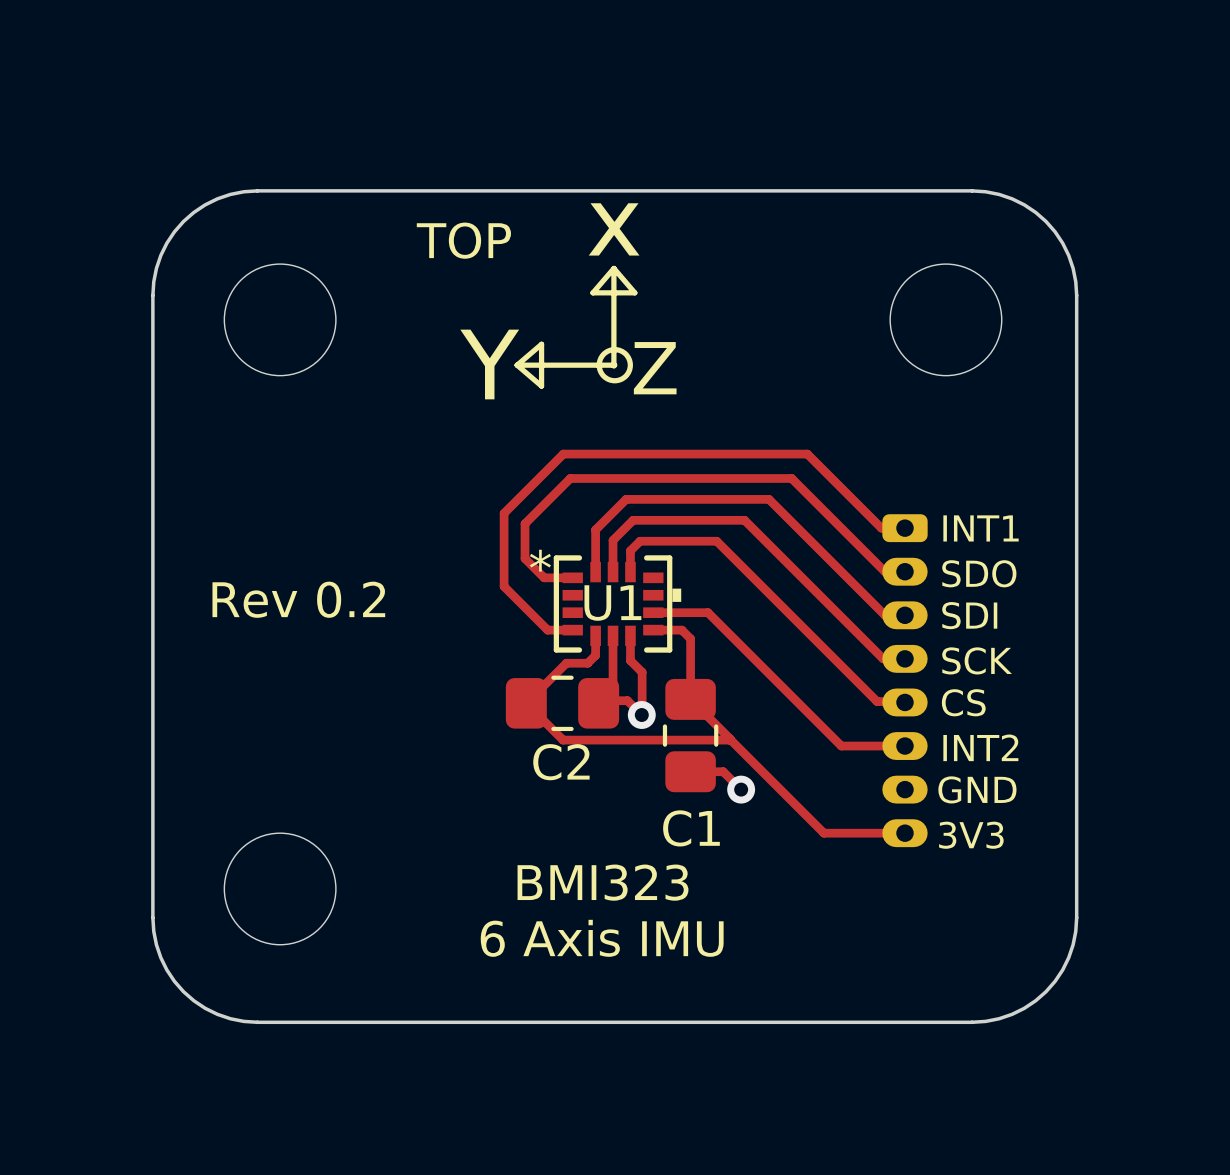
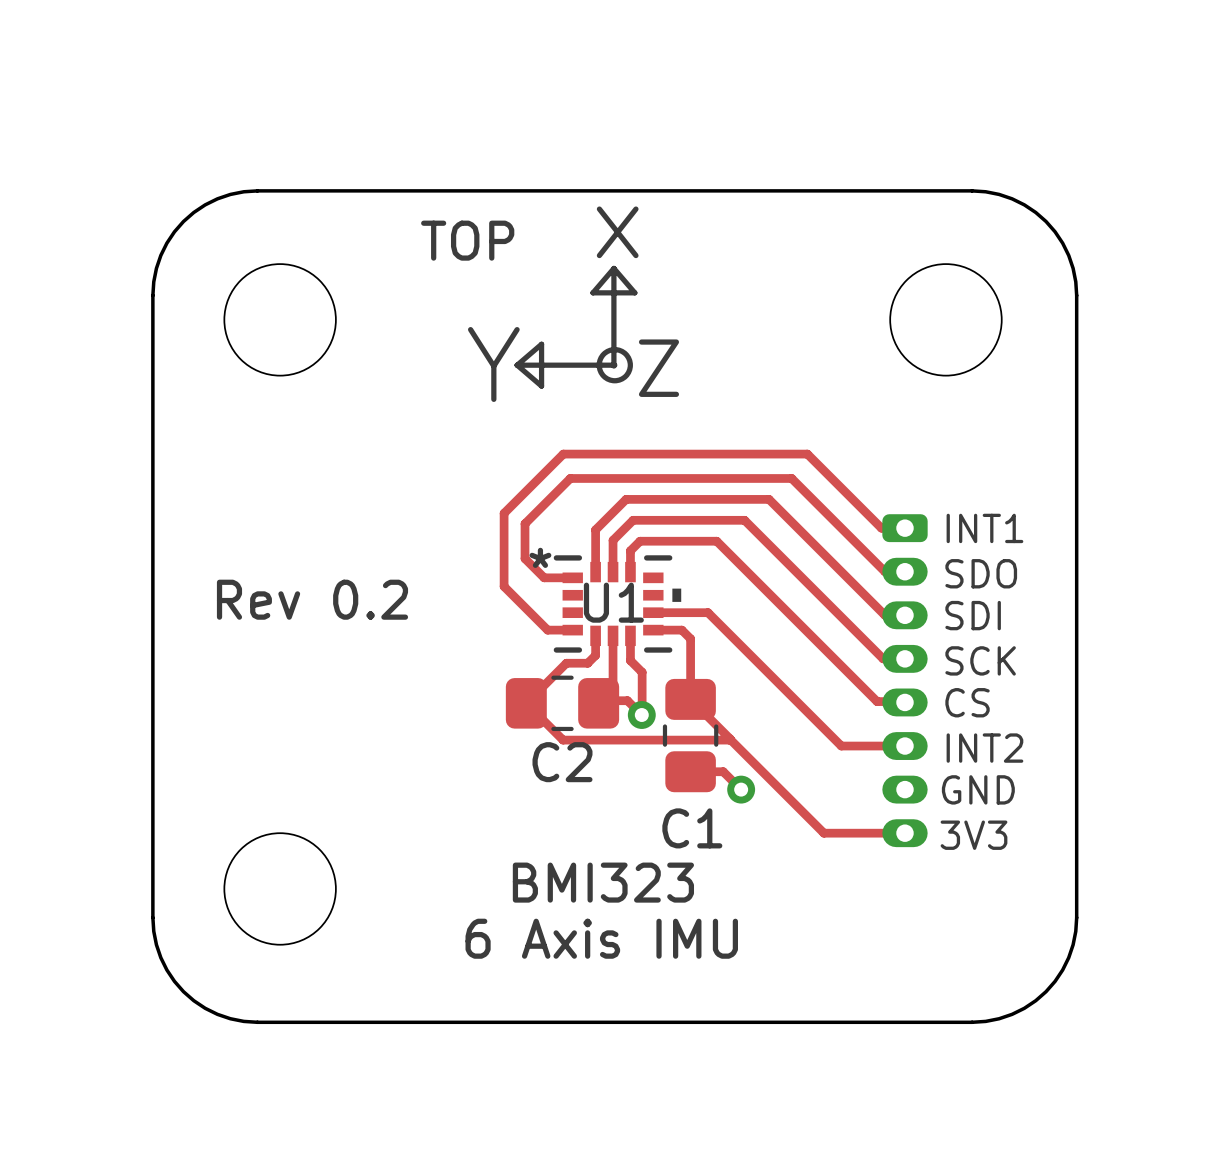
line: (556, 557) (556, 650) -> none
line: (669, 557) (669, 650) -> none

